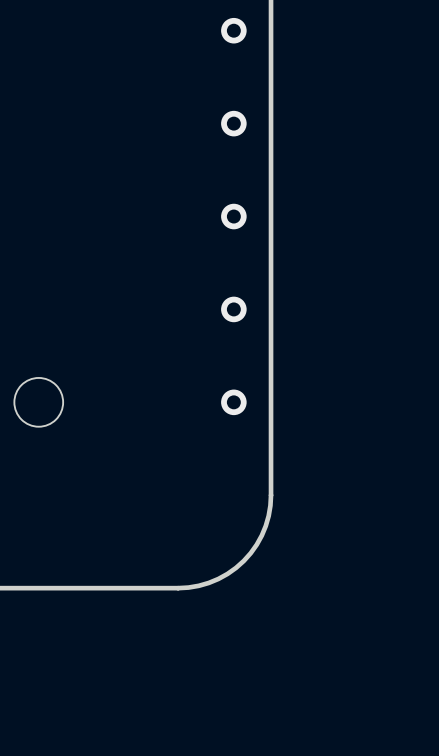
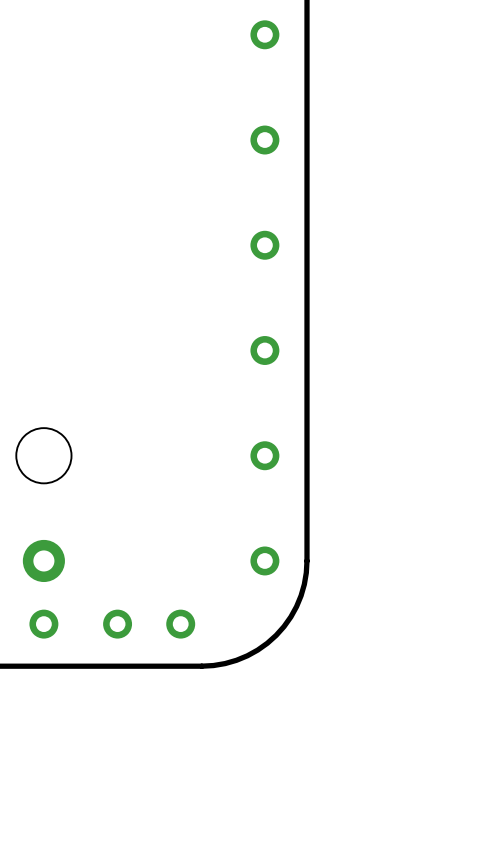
via: none -> (43, 560)
via: none -> (264, 560)
via: none -> (43, 624)
via: none -> (117, 624)
via: none -> (180, 624)

